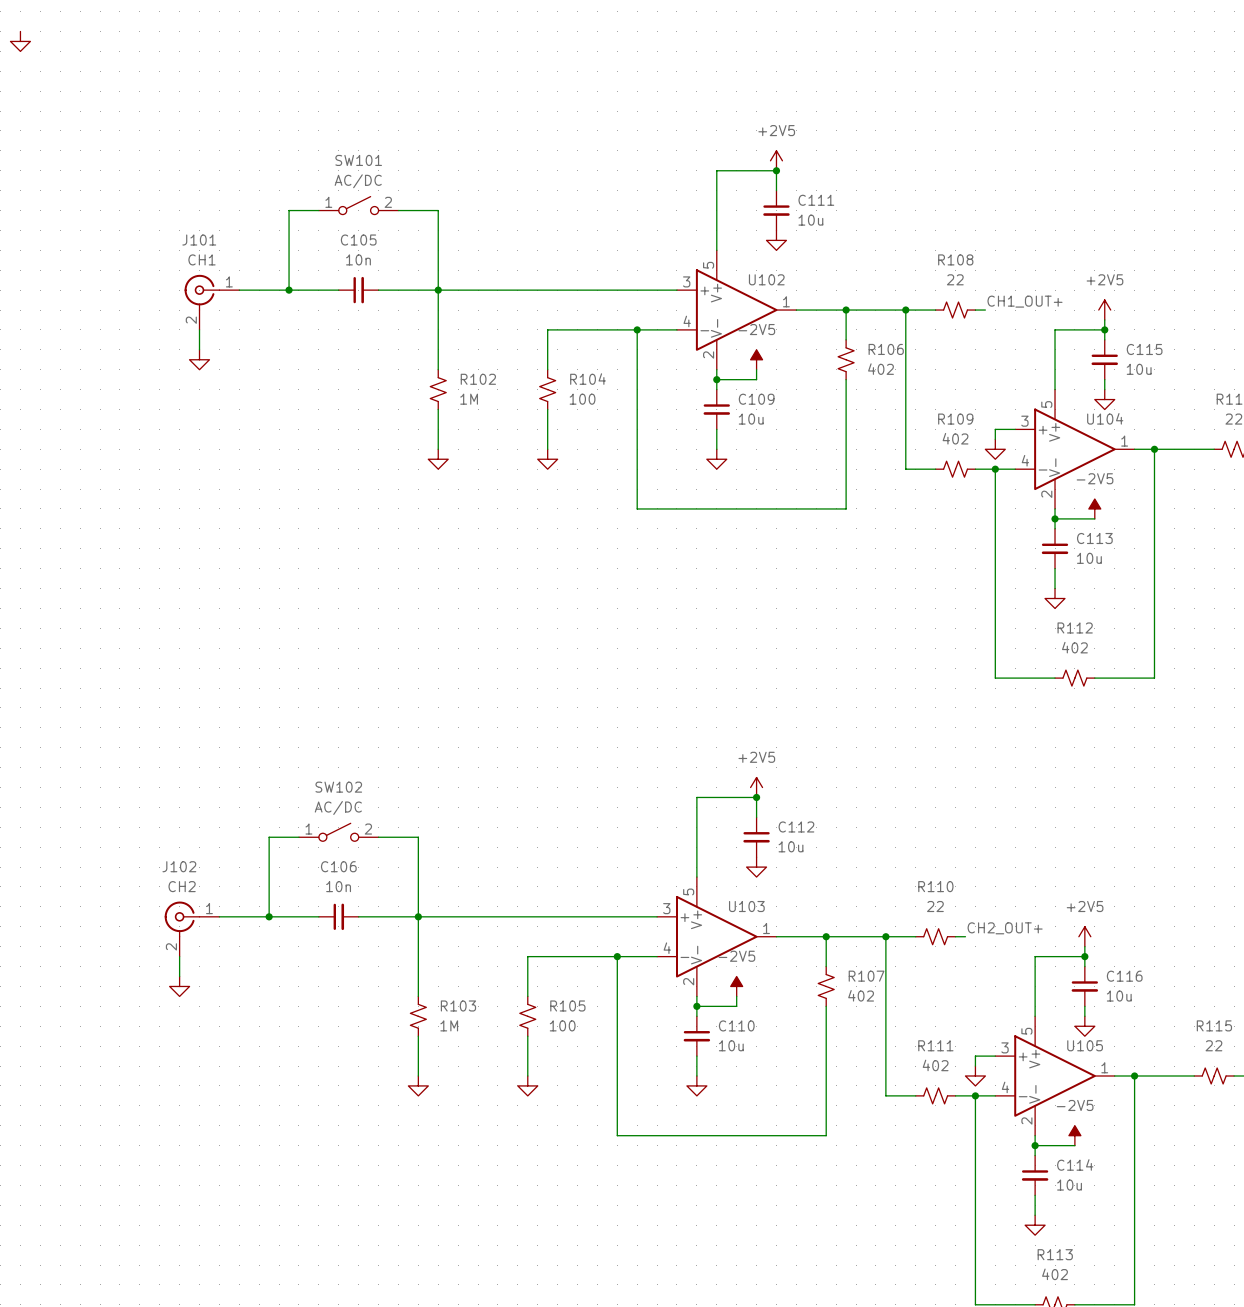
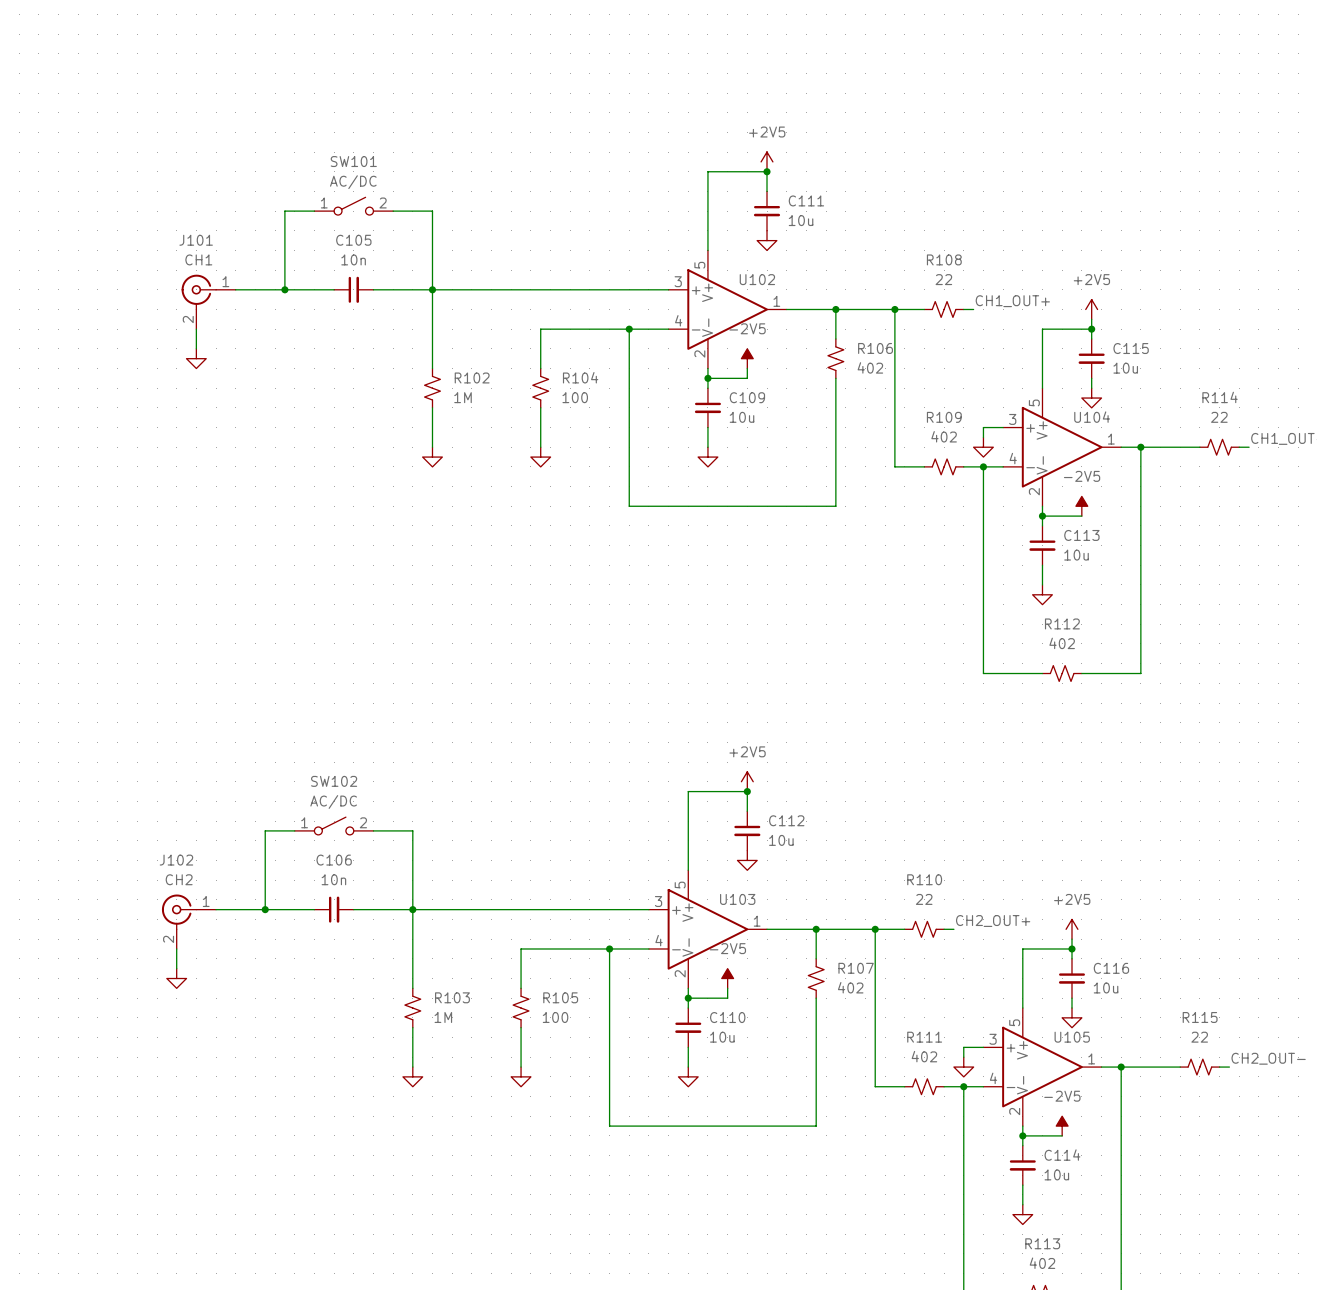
power symbol: (20, 41) -> none

